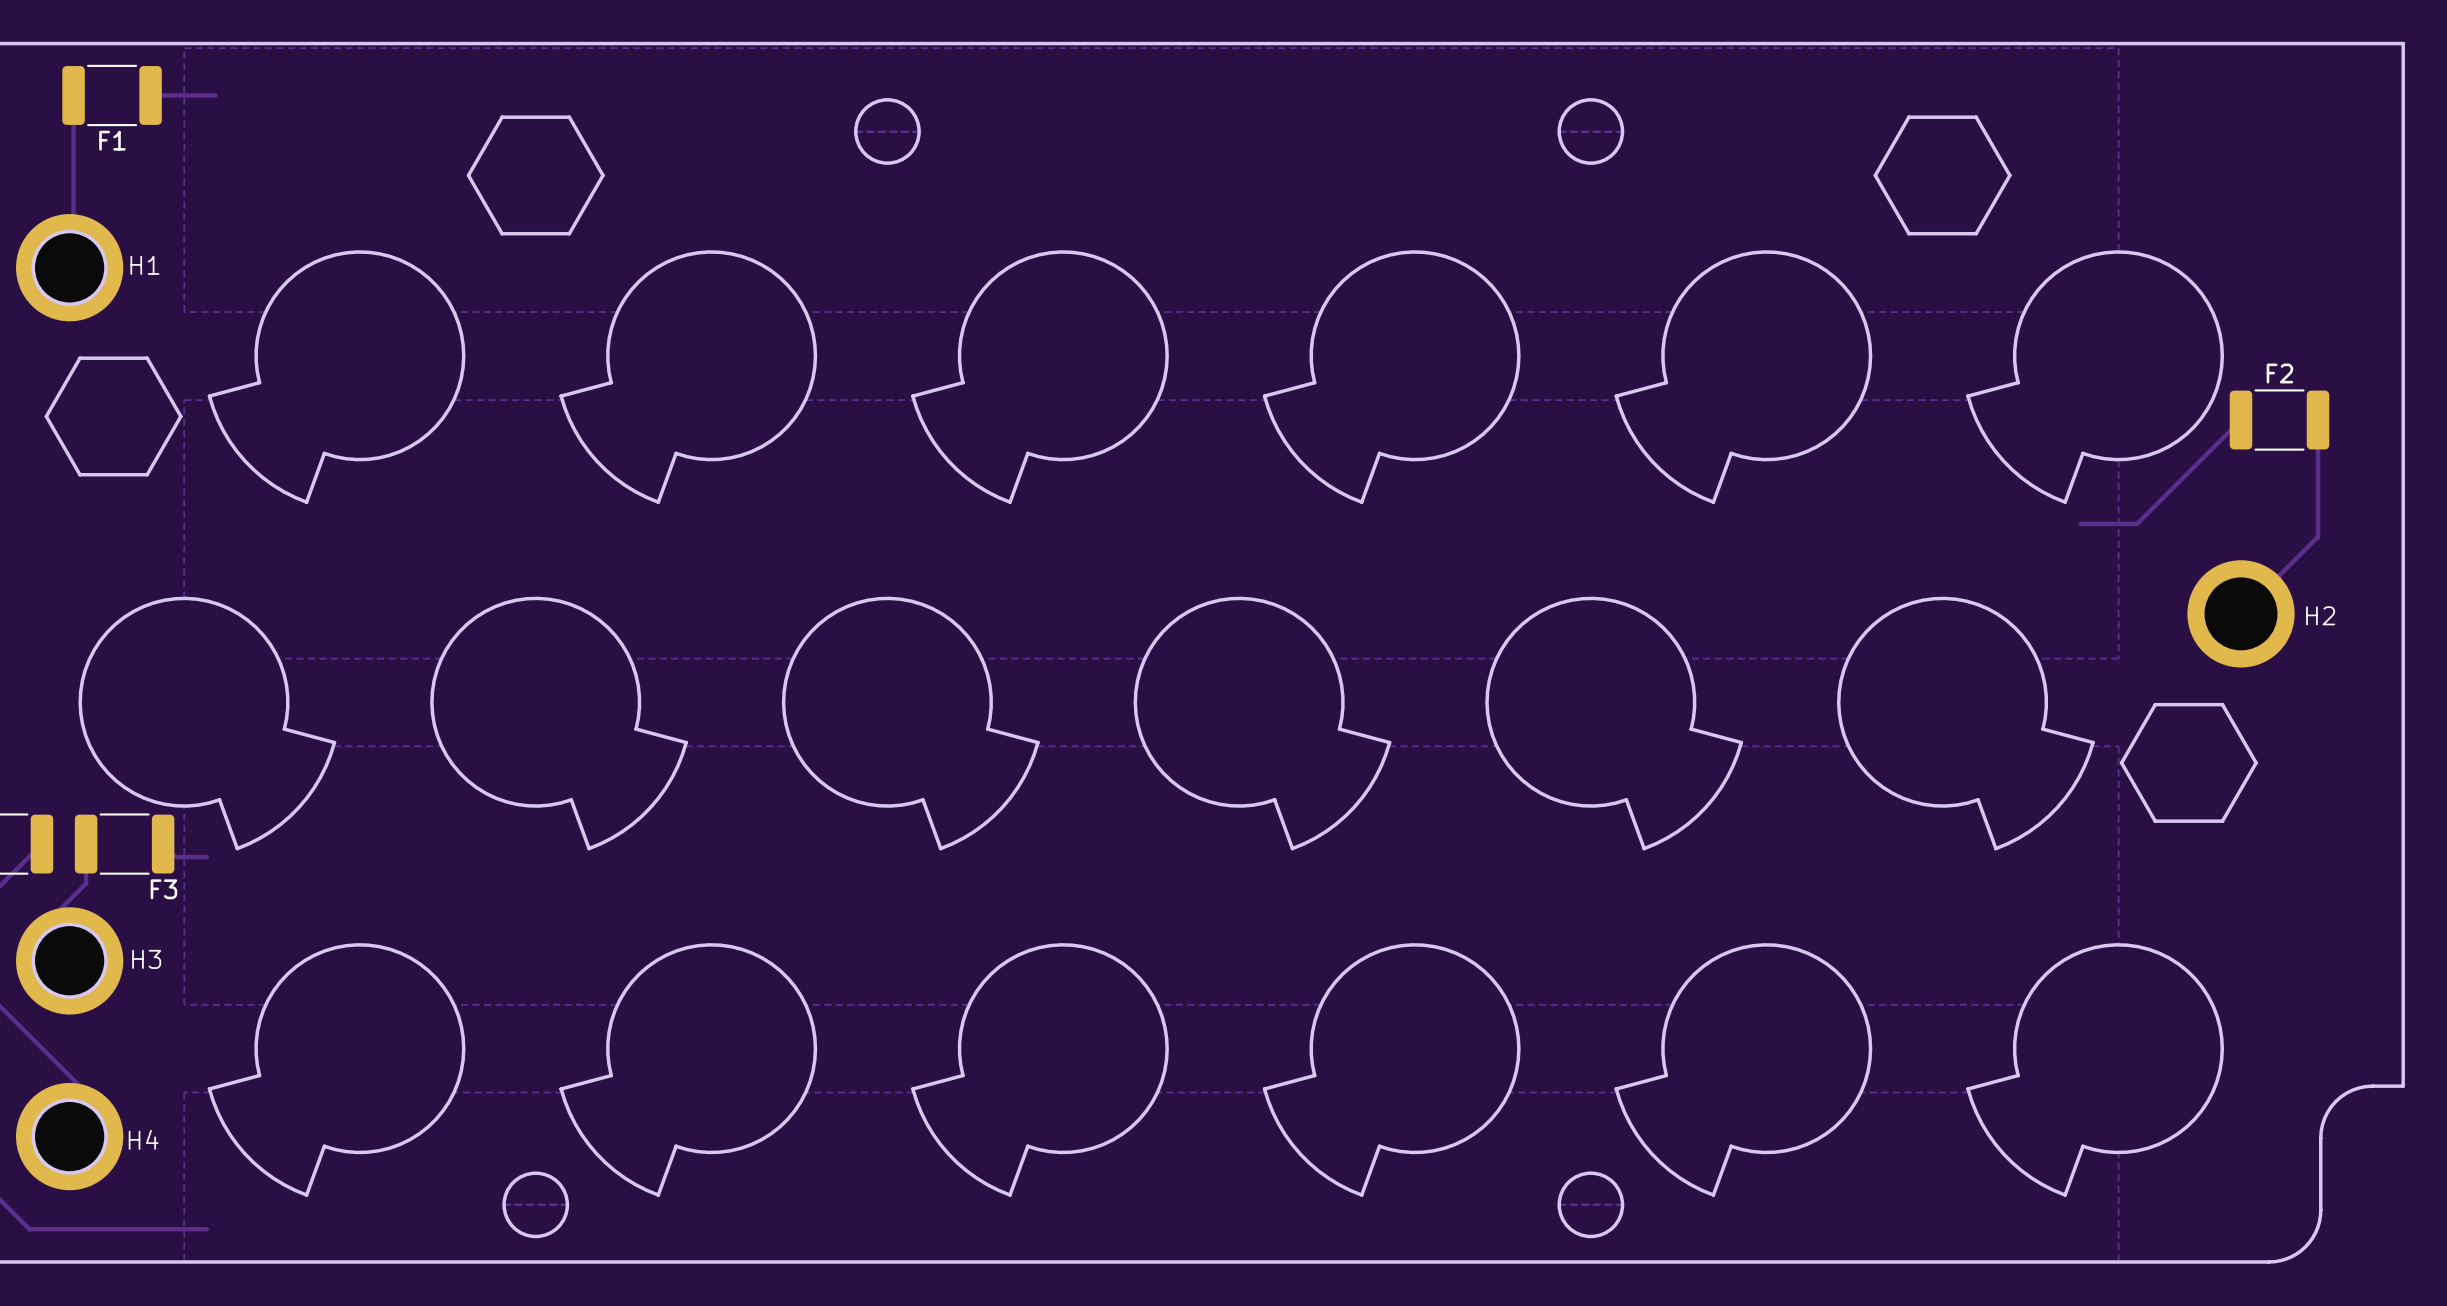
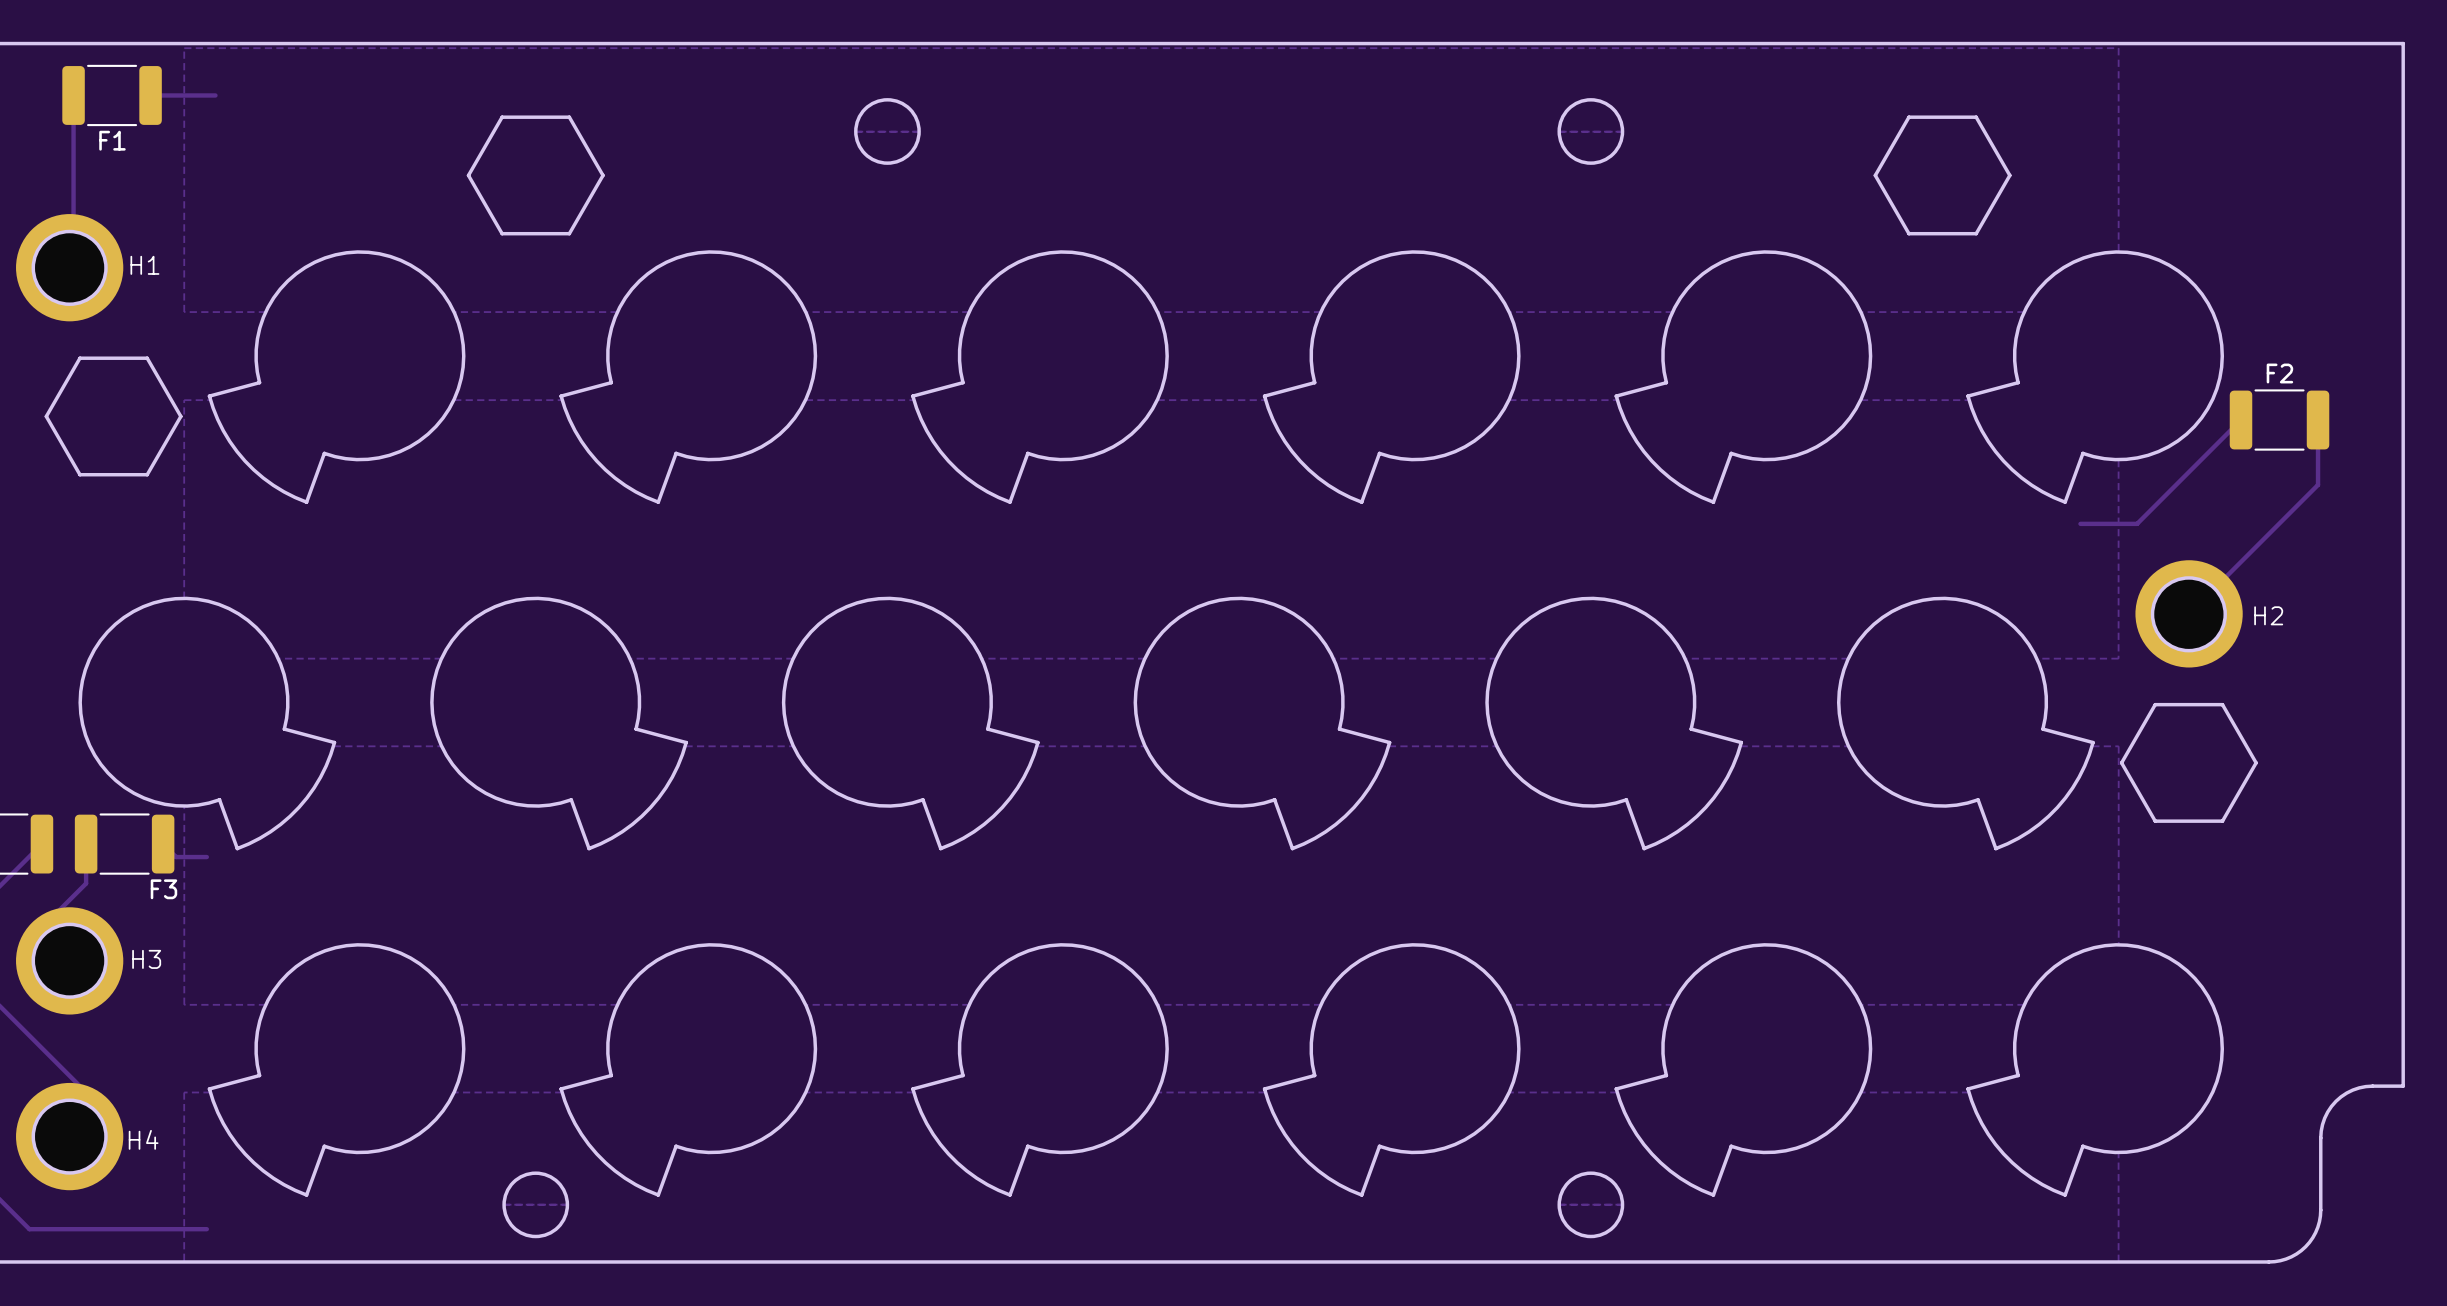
track: (2318, 484) (2318, 536) (2241, 613) -> (2318, 484) (2219, 583)
round board edge: none -> [2150, 576, 2227, 653]
H2 position: (2241, 613) -> (2189, 613)

